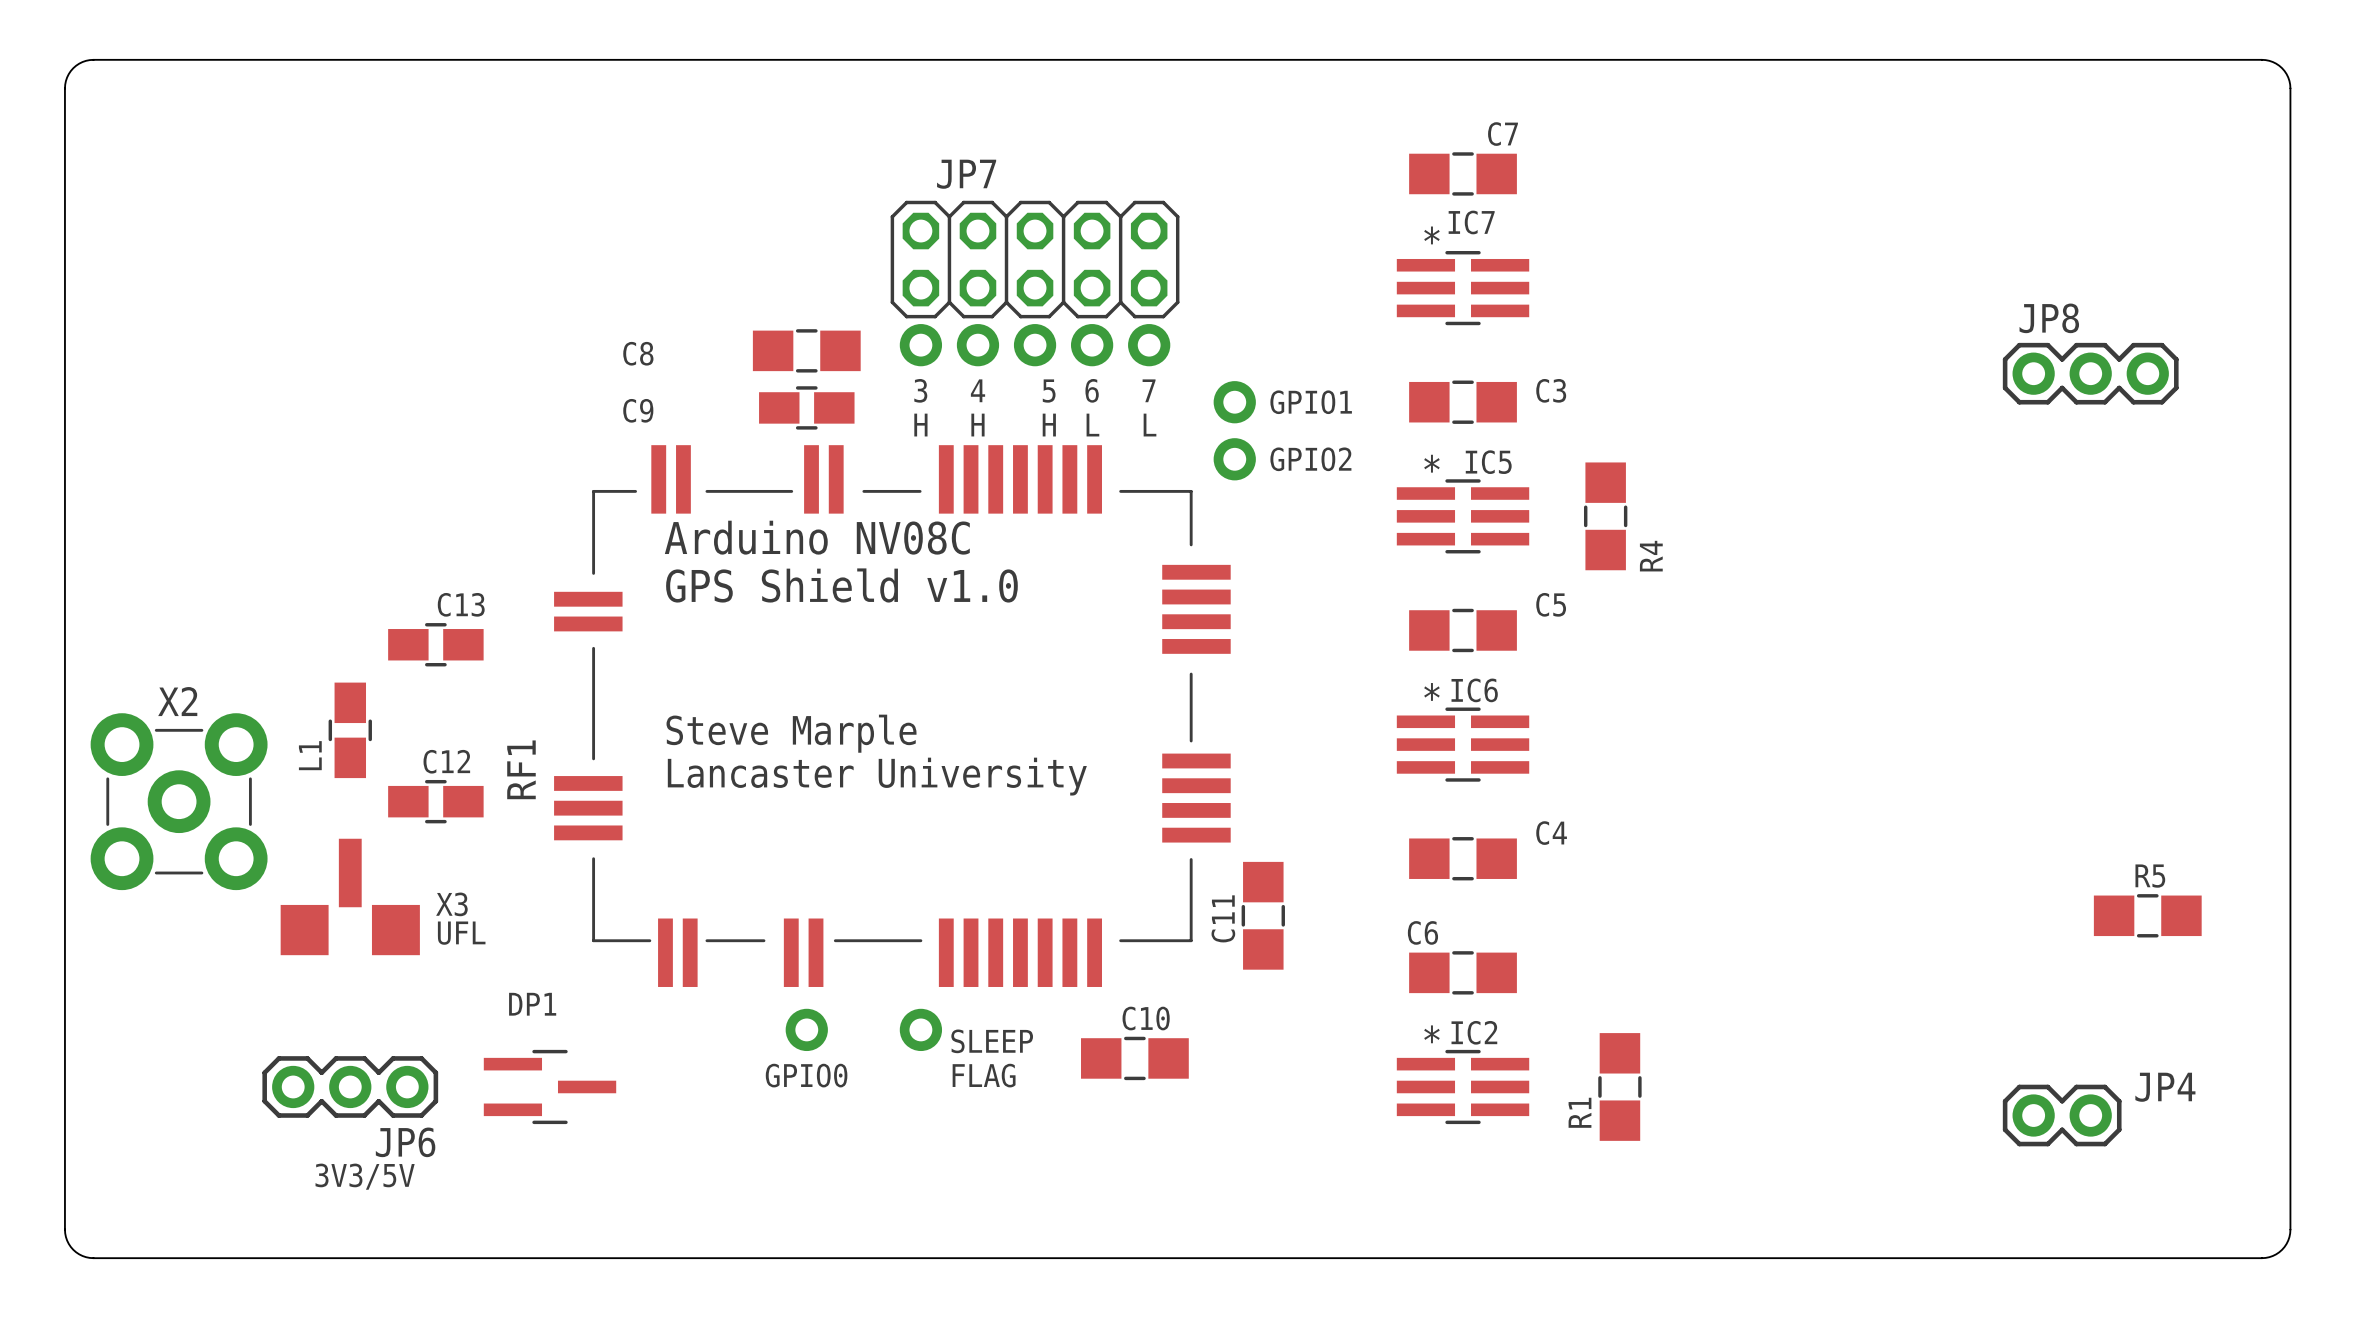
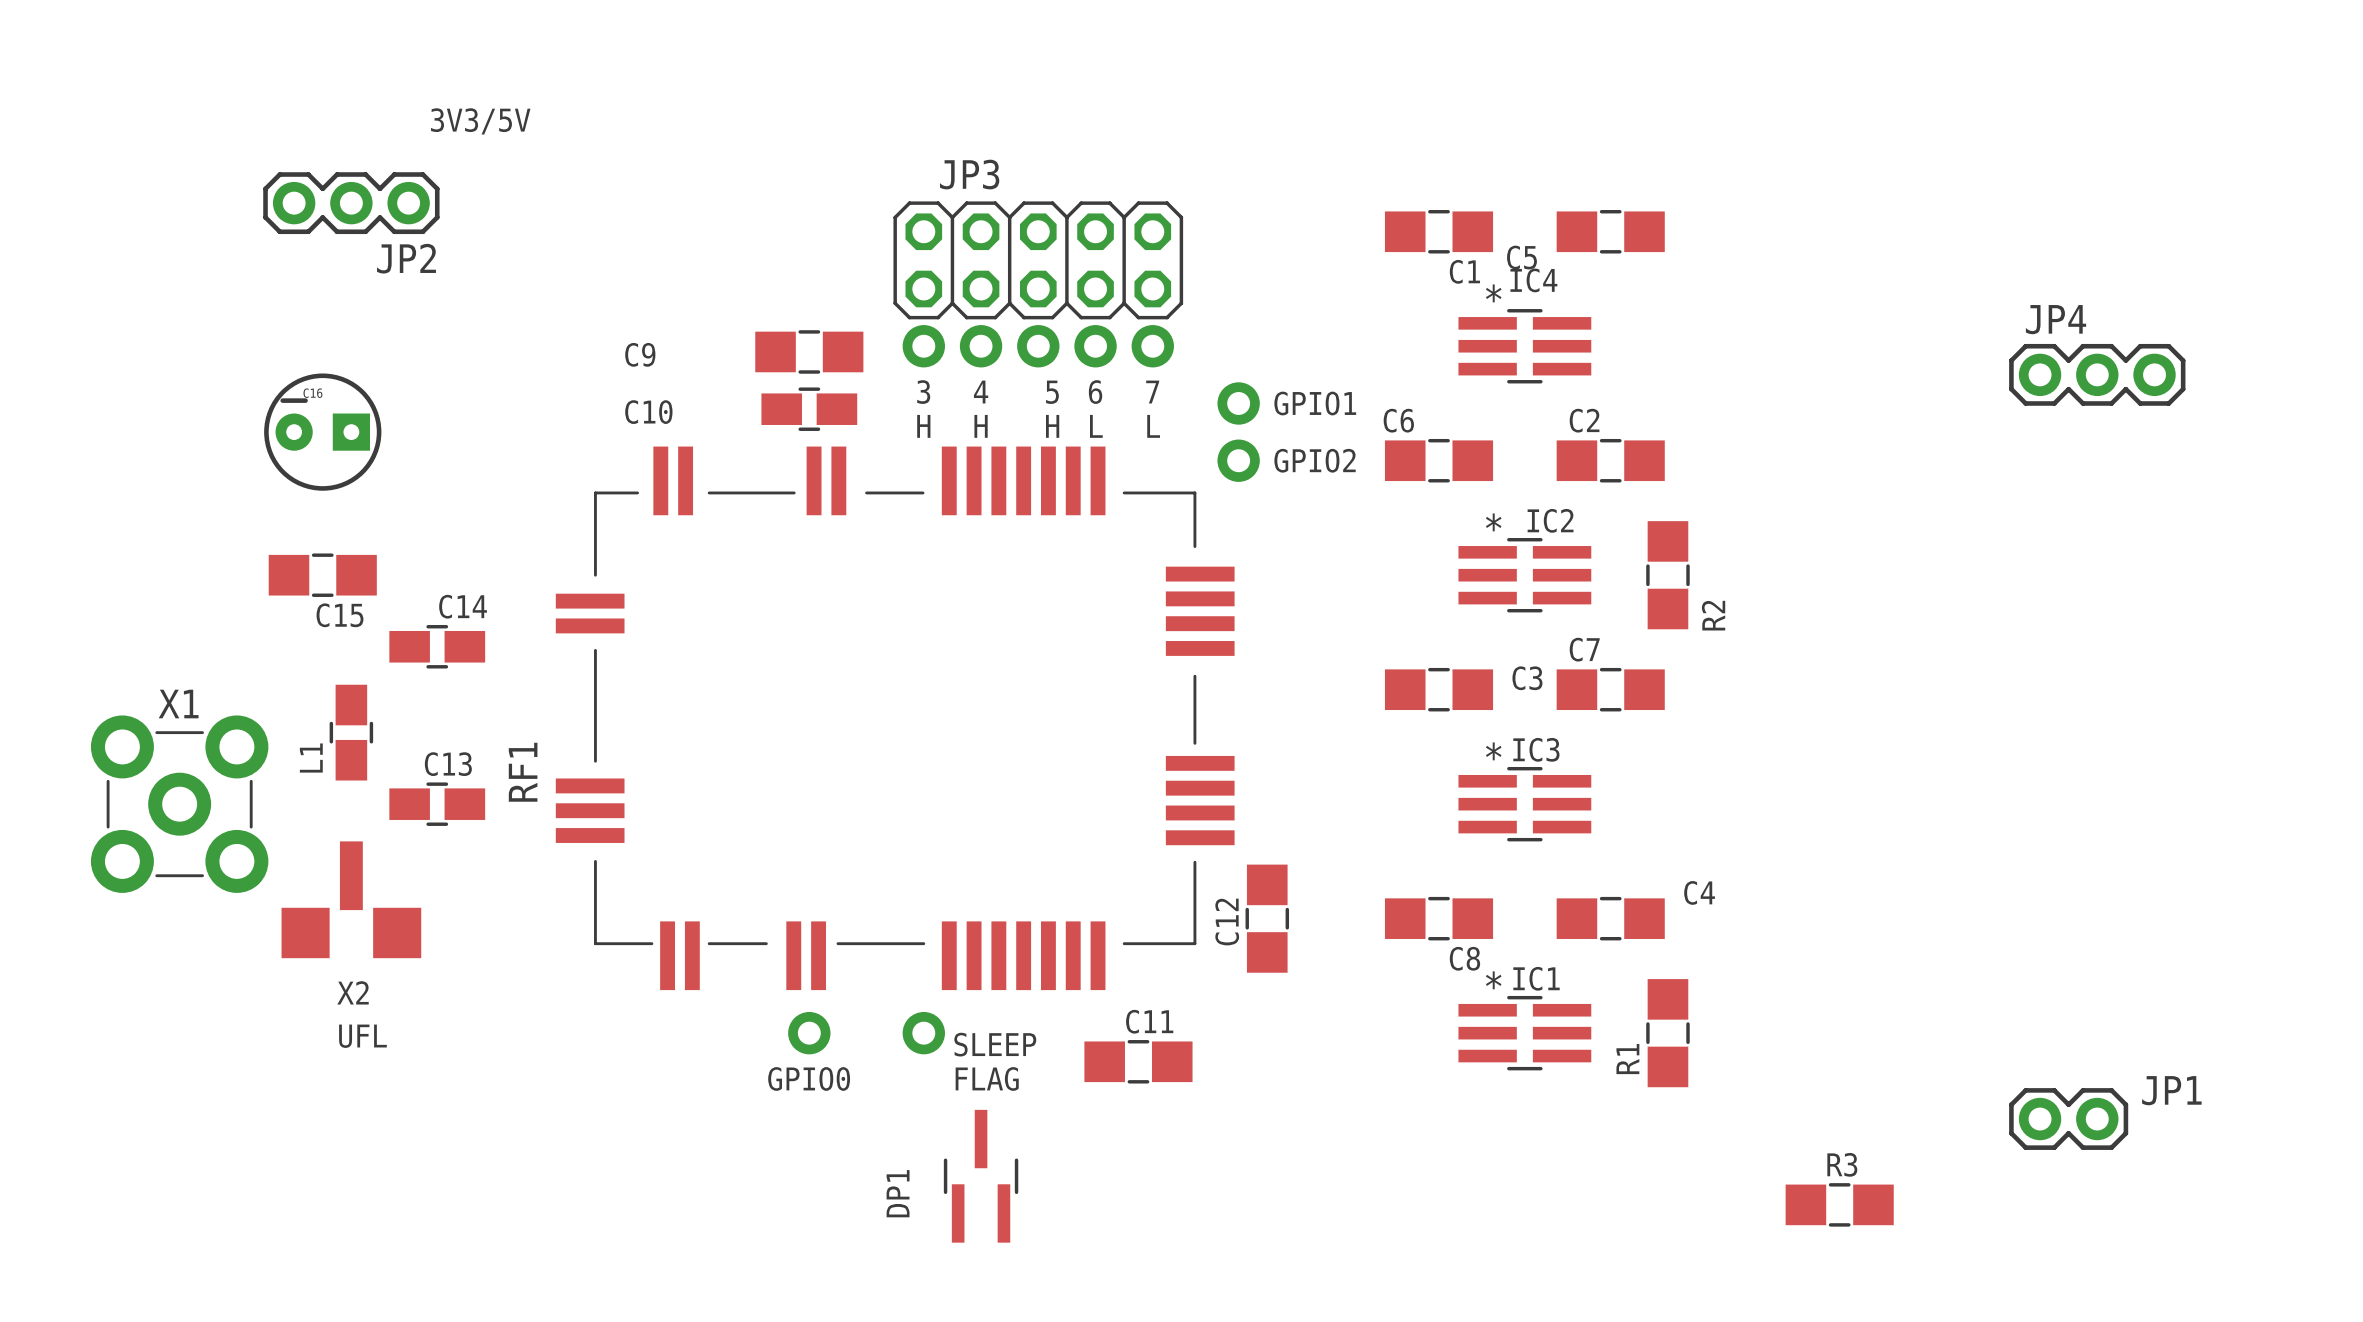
board edge: (93, 59) (2261, 59) (2276, 63) (2286, 74) (2290, 88) (2290, 1229) (2286, 1243) (2276, 1254) (2261, 1258) (93, 1258) (79, 1254) (68, 1243) (64, 1229) (64, 88) (67, 77) (73, 68) (82, 62) (93, 59) -> none
text: none -> 3V3/5V (480, 121)
C7 name position: C7 (1503, 134) -> C7 (1584, 649)
C7 position: (1463, 173) -> (1610, 689)
JP7 name: JP7 (966, 174) -> JP3 (969, 174)
JP2: none -> (351, 203)
C1: none -> (1438, 231)
IC7: (1463, 288) -> none
JP8 name: JP8 (2049, 318) -> JP4 (2056, 319)
IC4: none -> (1524, 346)
C8 name: C8 (638, 353) -> C9 (640, 354)
C3 position: (1463, 402) -> (1438, 689)
C9 name: C9 (638, 410) -> C10 (648, 412)
C16: none -> (322, 432)
C2: none -> (1610, 460)
IC5: (1463, 516) -> none
R4: (1605, 516) -> none
text: Arduino NV08C (817, 537) -> none
C15: none -> (322, 575)
R2: none -> (1667, 575)
text: GPS Shield v1.0 (841, 585) -> none
C13 name: C13 (461, 604) -> C14 (463, 606)
C5 name position: C5 (1551, 604) -> C5 (1521, 257)
C5 position: (1463, 630) -> (1610, 231)
X2 name: X2 (177, 701) -> X1 (178, 704)
text: Steve Marple (791, 733) -> none
IC6: (1463, 744) -> none
C12 name: C12 (446, 761) -> C13 (448, 764)
text: Lancaster University (877, 776) -> none
IC3: none -> (1524, 804)
C4 position: (1463, 858) -> (1610, 918)
X3 name: X3 (451, 904) -> X2 (353, 992)
C8: none -> (1438, 918)
R5: (2147, 915) -> none
C11 name: C11 (1223, 918) -> C12 (1227, 922)
X3 value position: UFL (461, 933) -> UFL (362, 1036)
C6 position: (1463, 972) -> (1438, 460)
C10 name: C10 (1146, 1018) -> C11 (1149, 1021)
IC1: none -> (1524, 1033)
IC2 name position: IC2 (1474, 1032) -> IC2 (1550, 520)
JP6: (350, 1086) -> none
DP1 rotation: 0° (550, 1086) -> 90° counterclockwise (981, 1176)
DP1 position: (550, 1086) -> (981, 1176)
IC2 position: (1463, 1086) -> (1524, 575)
R1 position: (1619, 1086) -> (1667, 1033)
JP4 name: JP4 (2165, 1087) -> JP1 (2171, 1090)
text: 3V3/5V (365, 1176) -> none
R3: none -> (1839, 1204)

